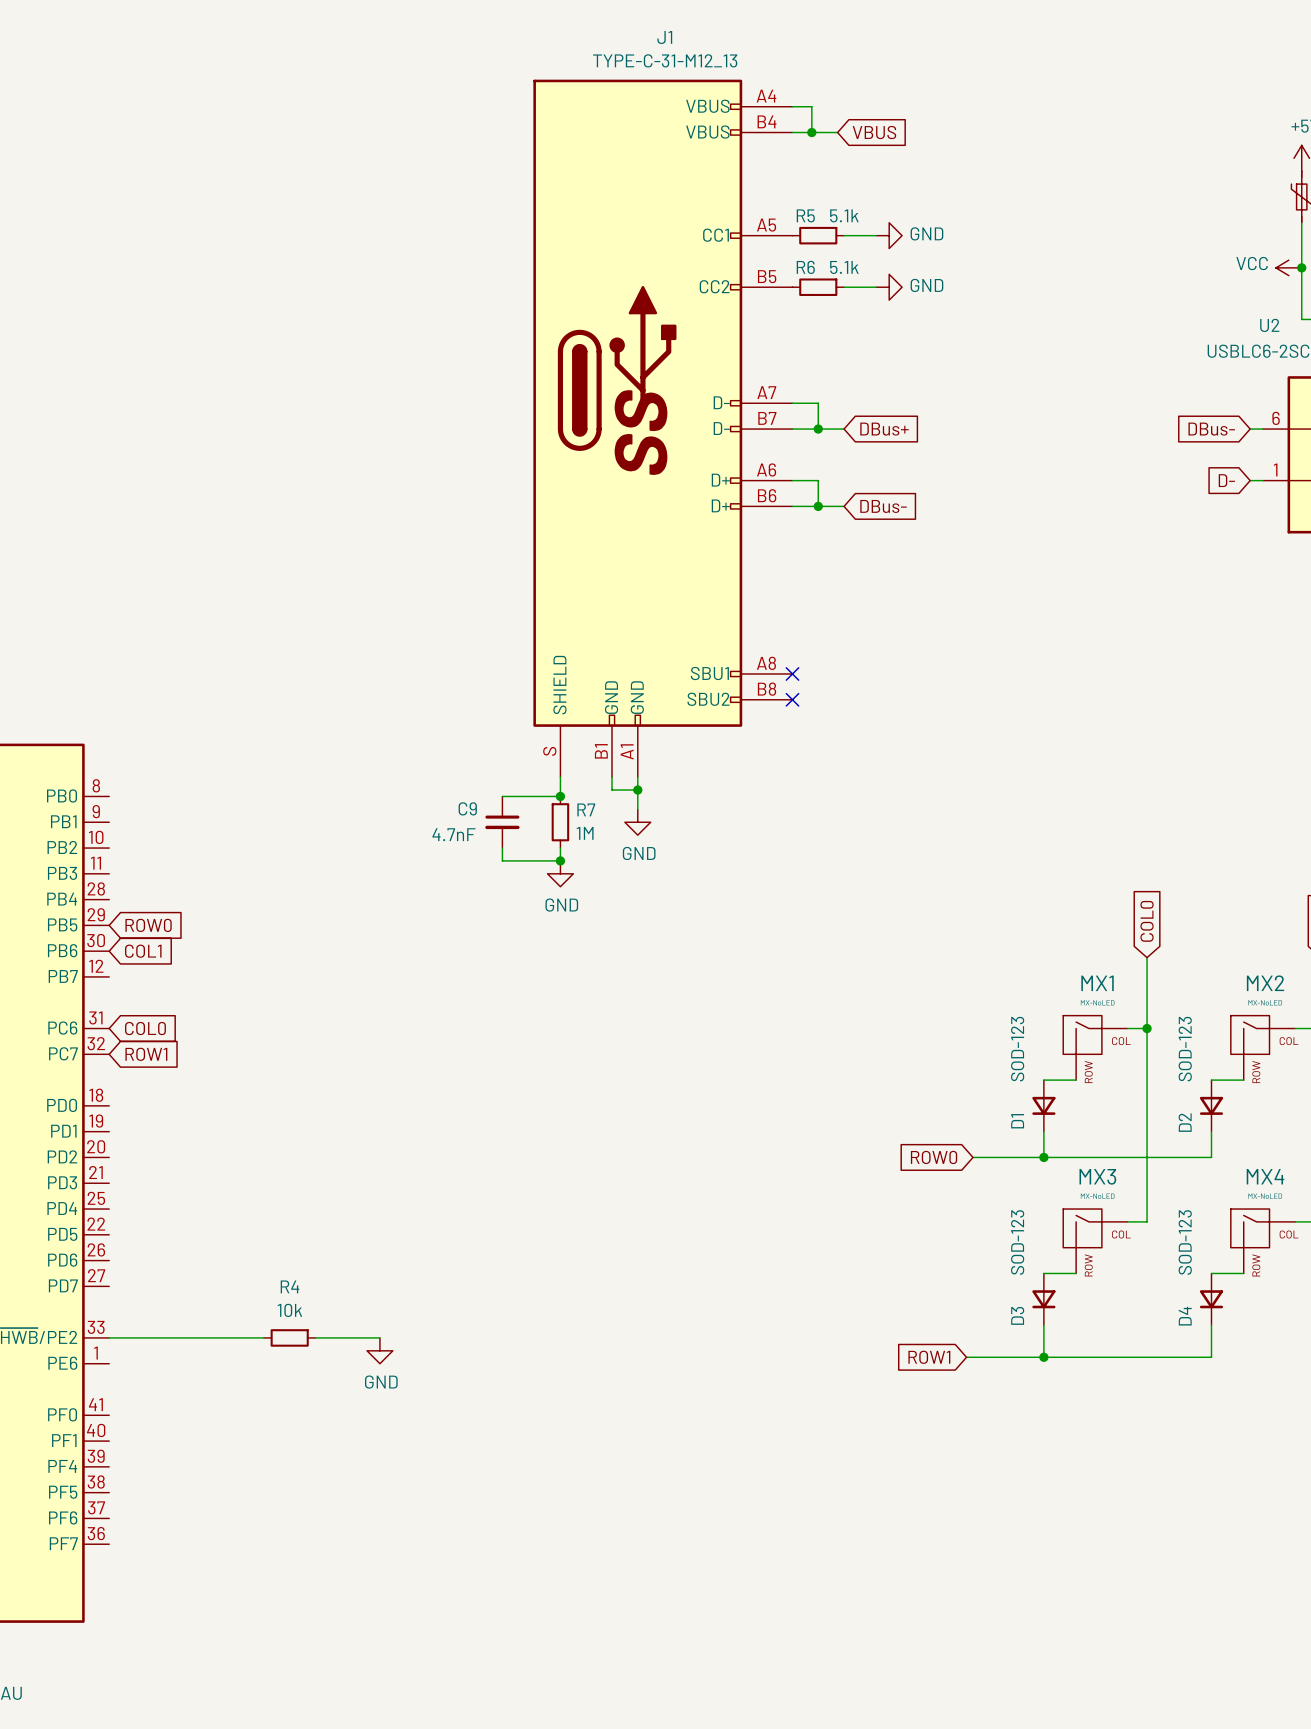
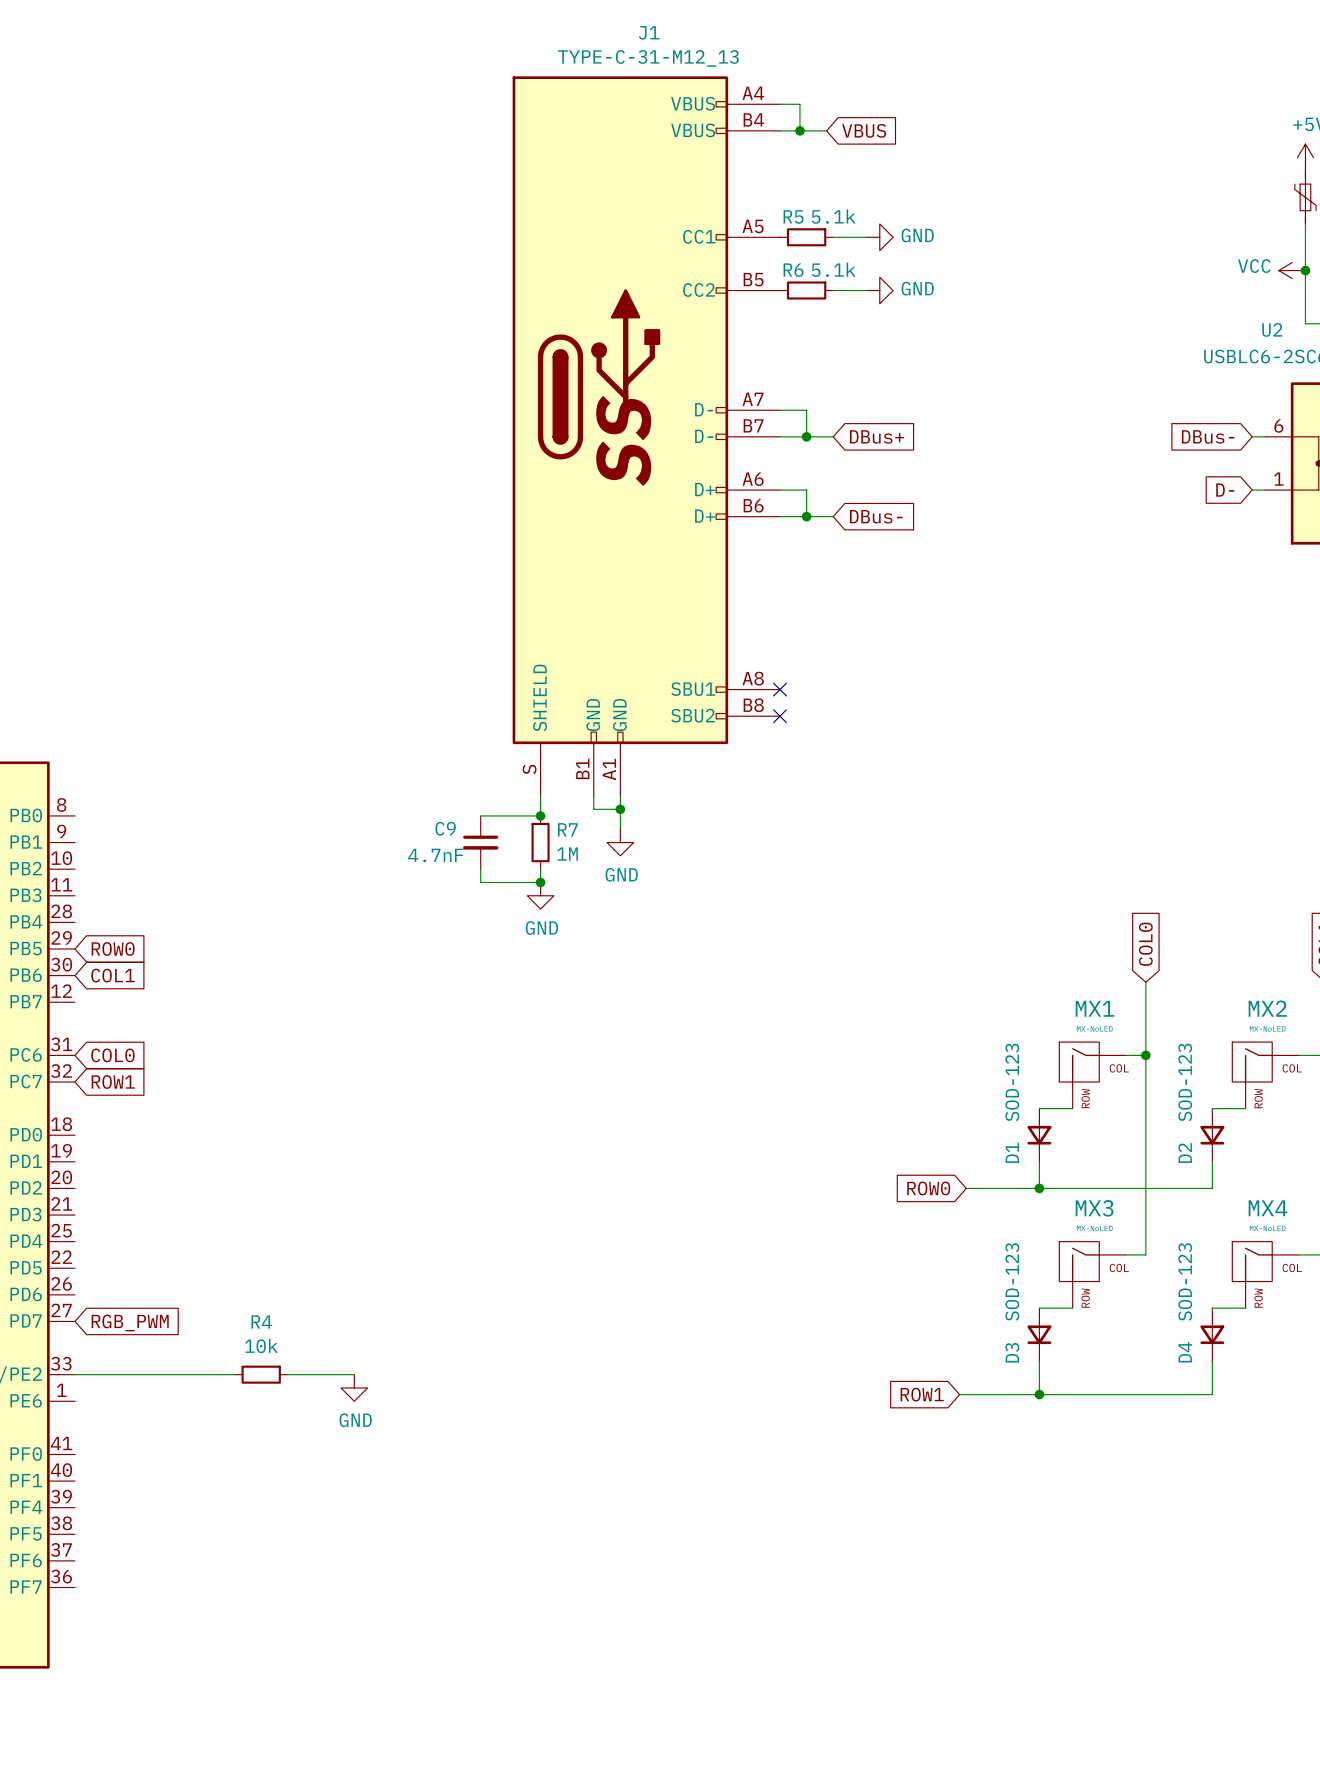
global label: none -> RGB_PWM (130, 1322)

